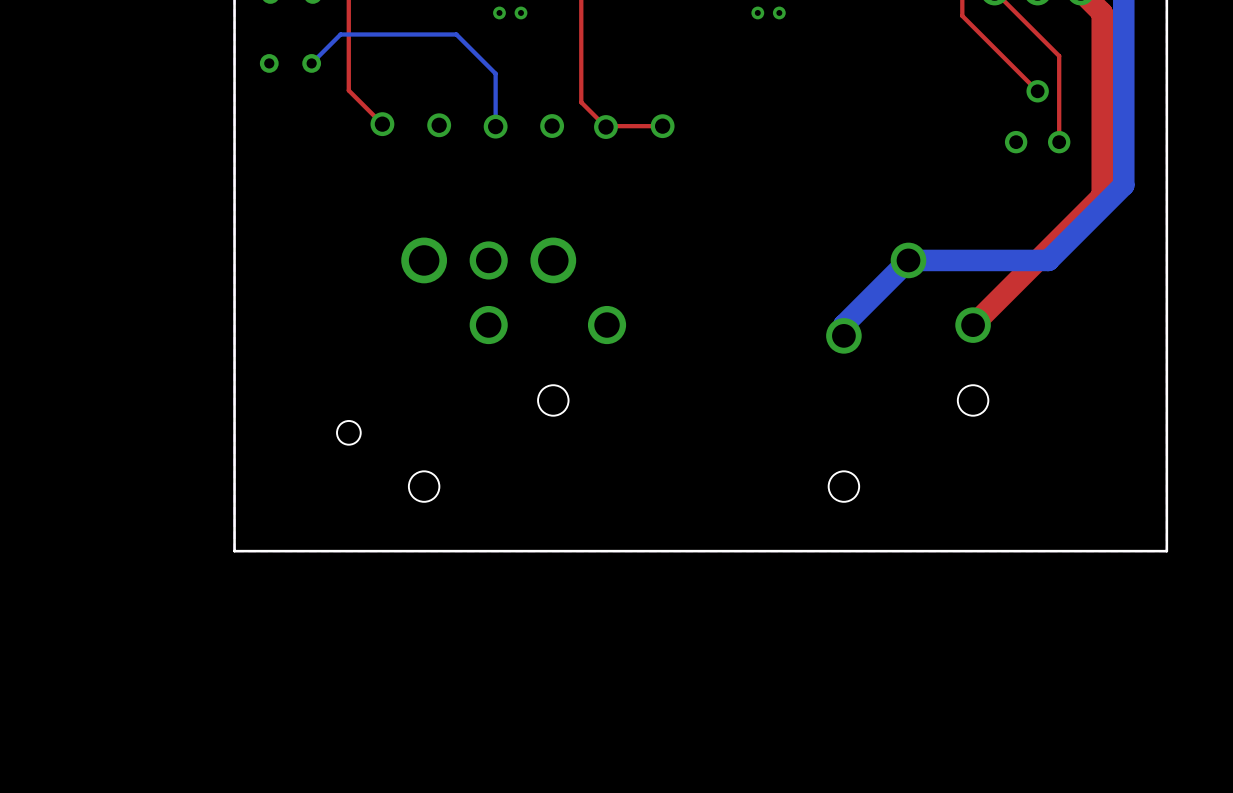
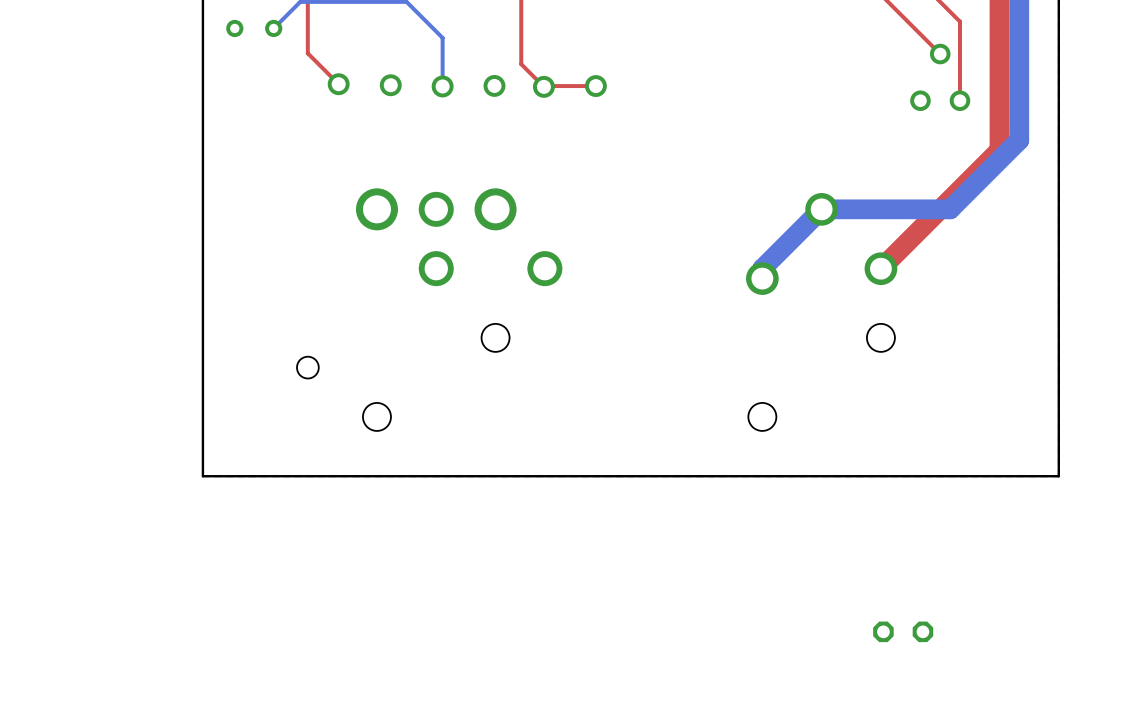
part: none -> (903, 631)

